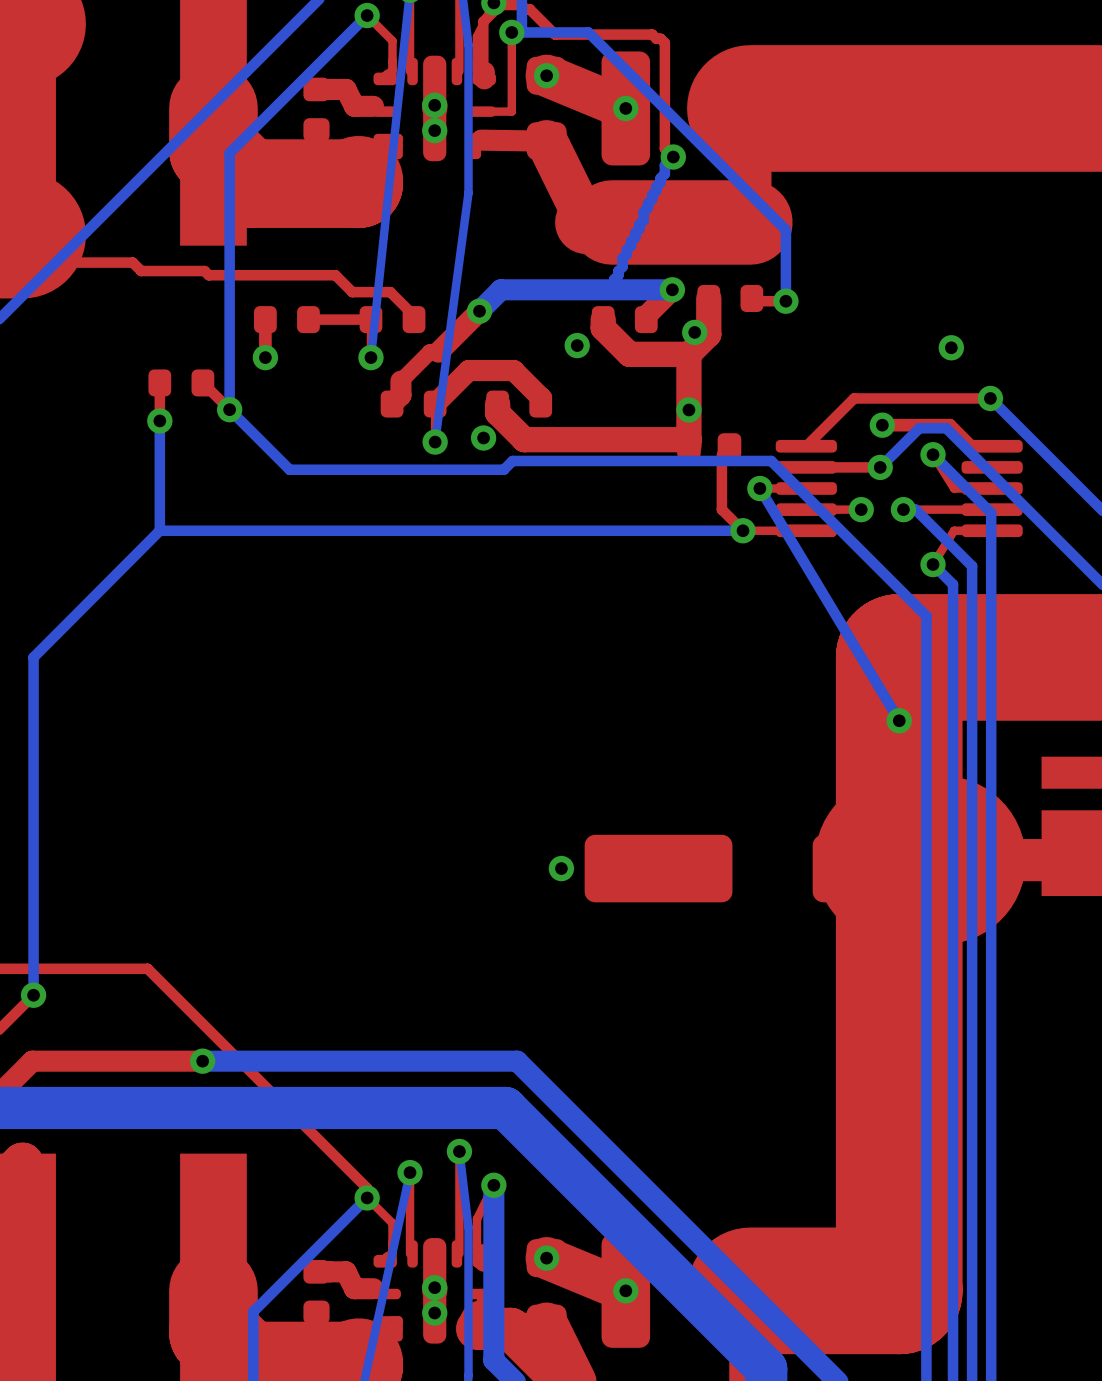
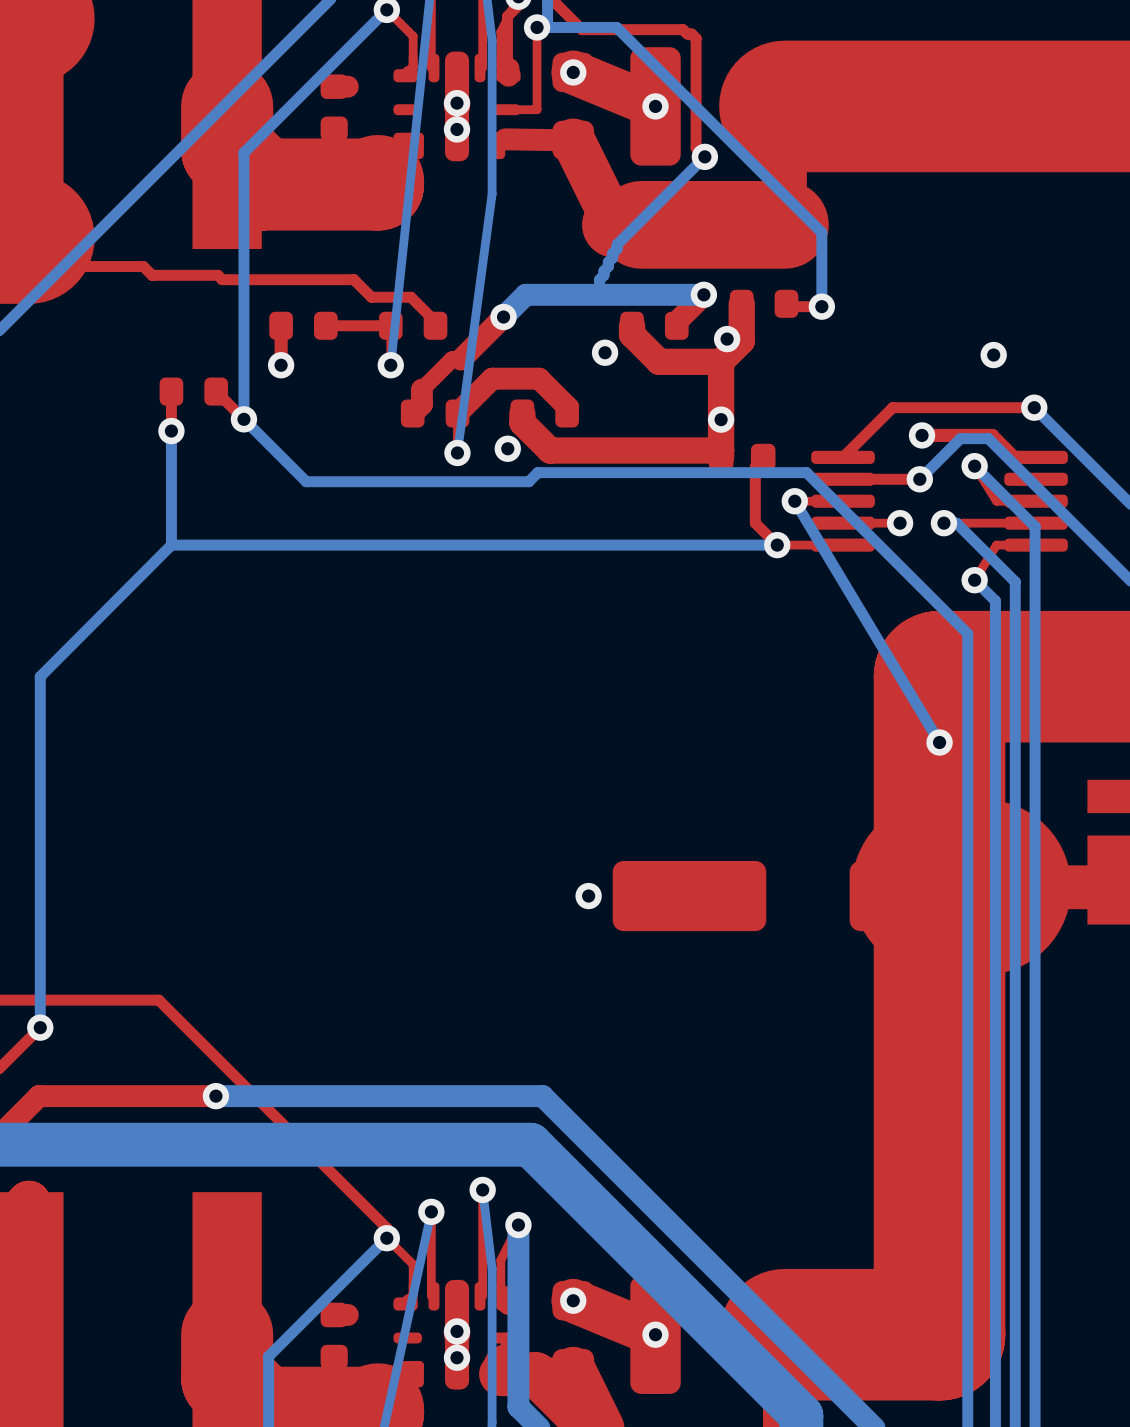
top track: (329, 89) (346, 89) (354, 106) (373, 106) -> none
bottom track: (664, 165) (664, 173) (660, 178) (660, 182) (656, 186) (656, 190) (643, 211) (643, 220) (631, 241) (631, 245) (626, 249) (626, 254) (622, 258) (622, 266) (609, 287) -> (696, 165) (617, 244) (617, 248) (612, 253) (608, 266) (599, 279) (599, 288) (595, 292)
top track: (329, 1271) (346, 1271) (354, 1288) (373, 1288) -> none

